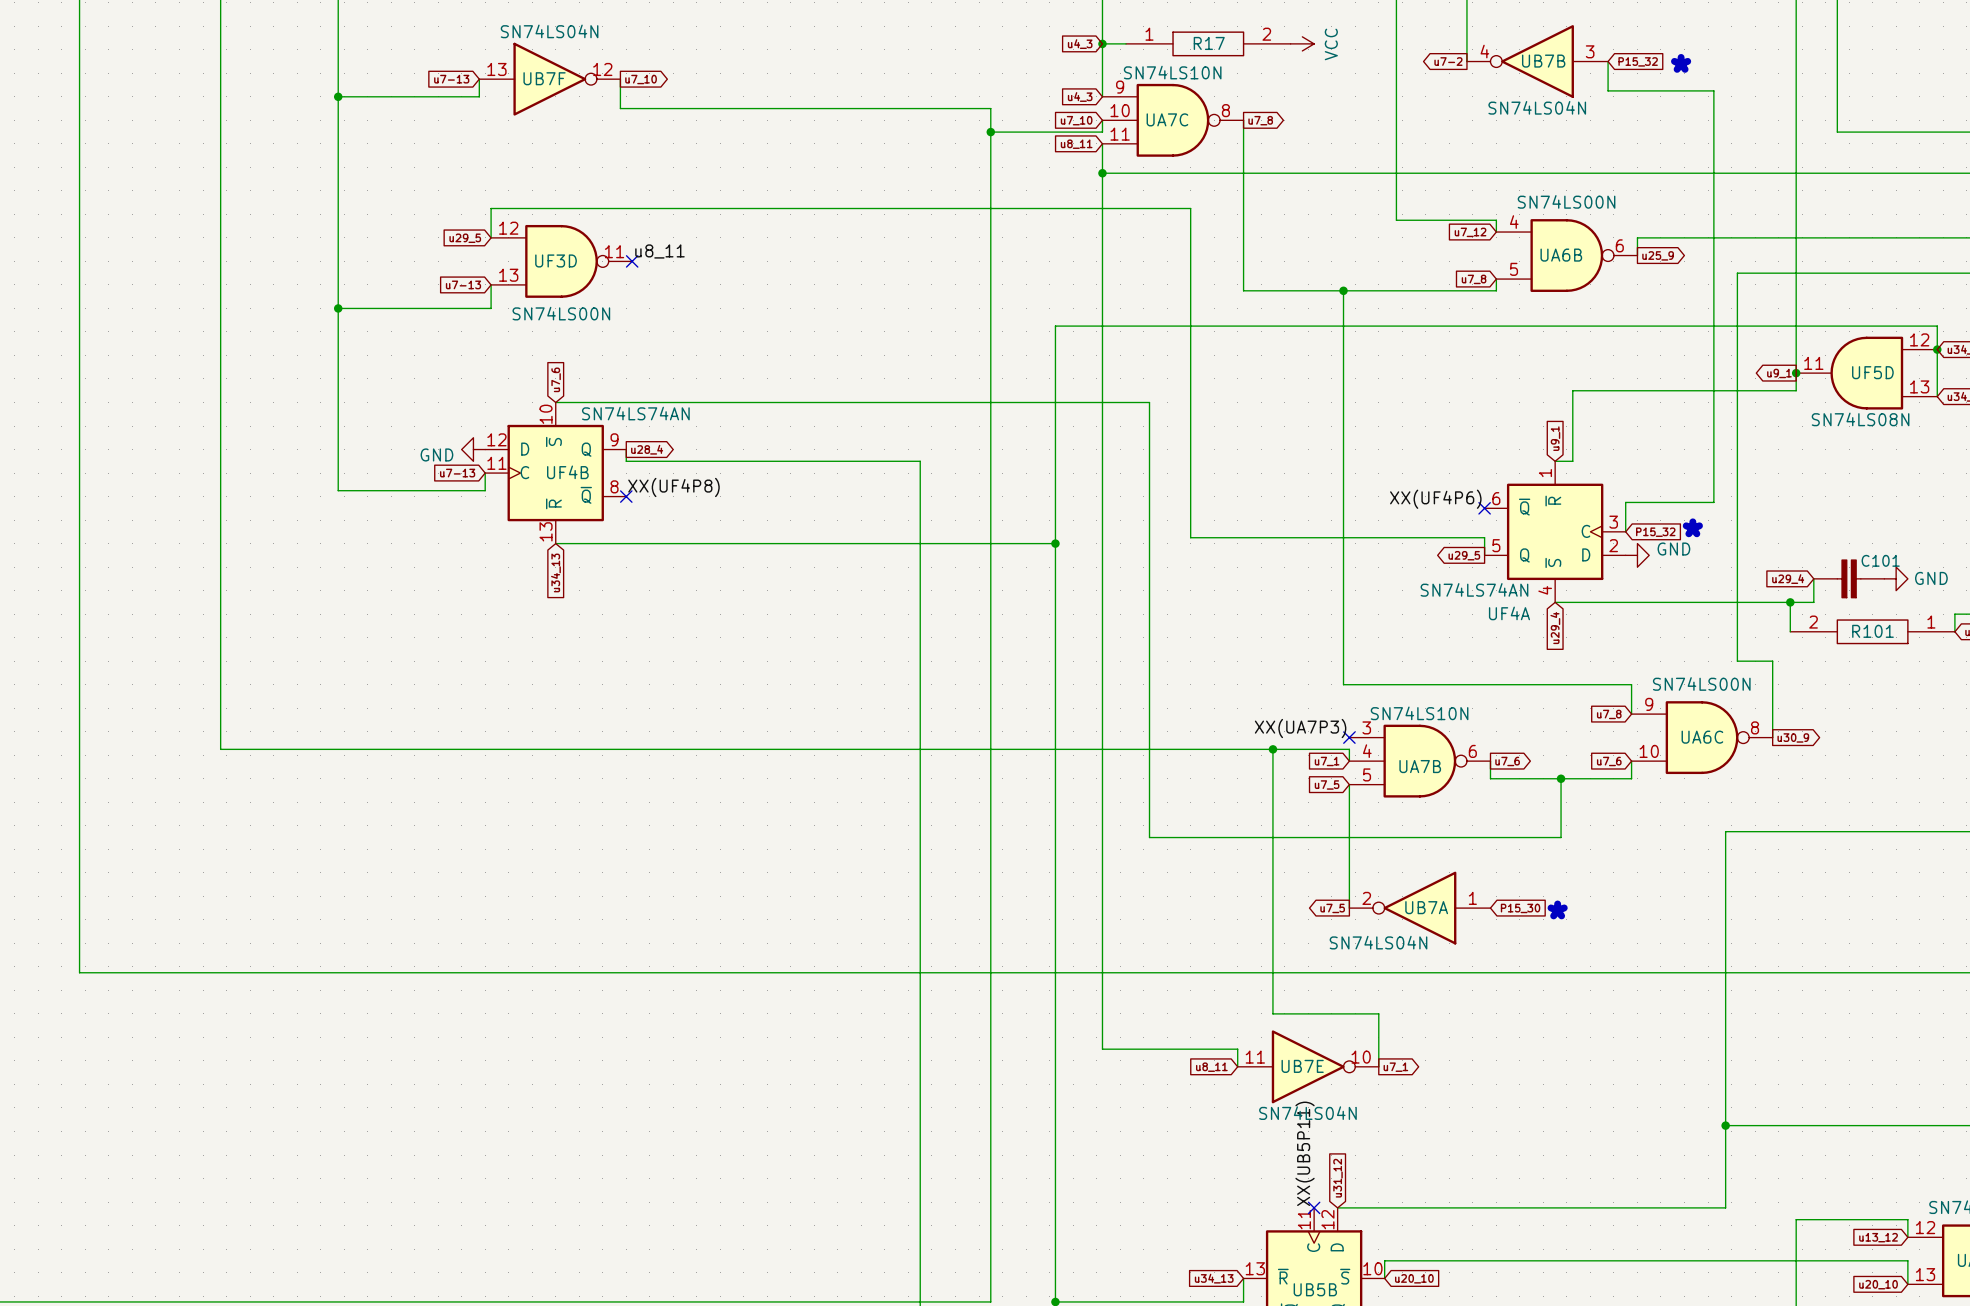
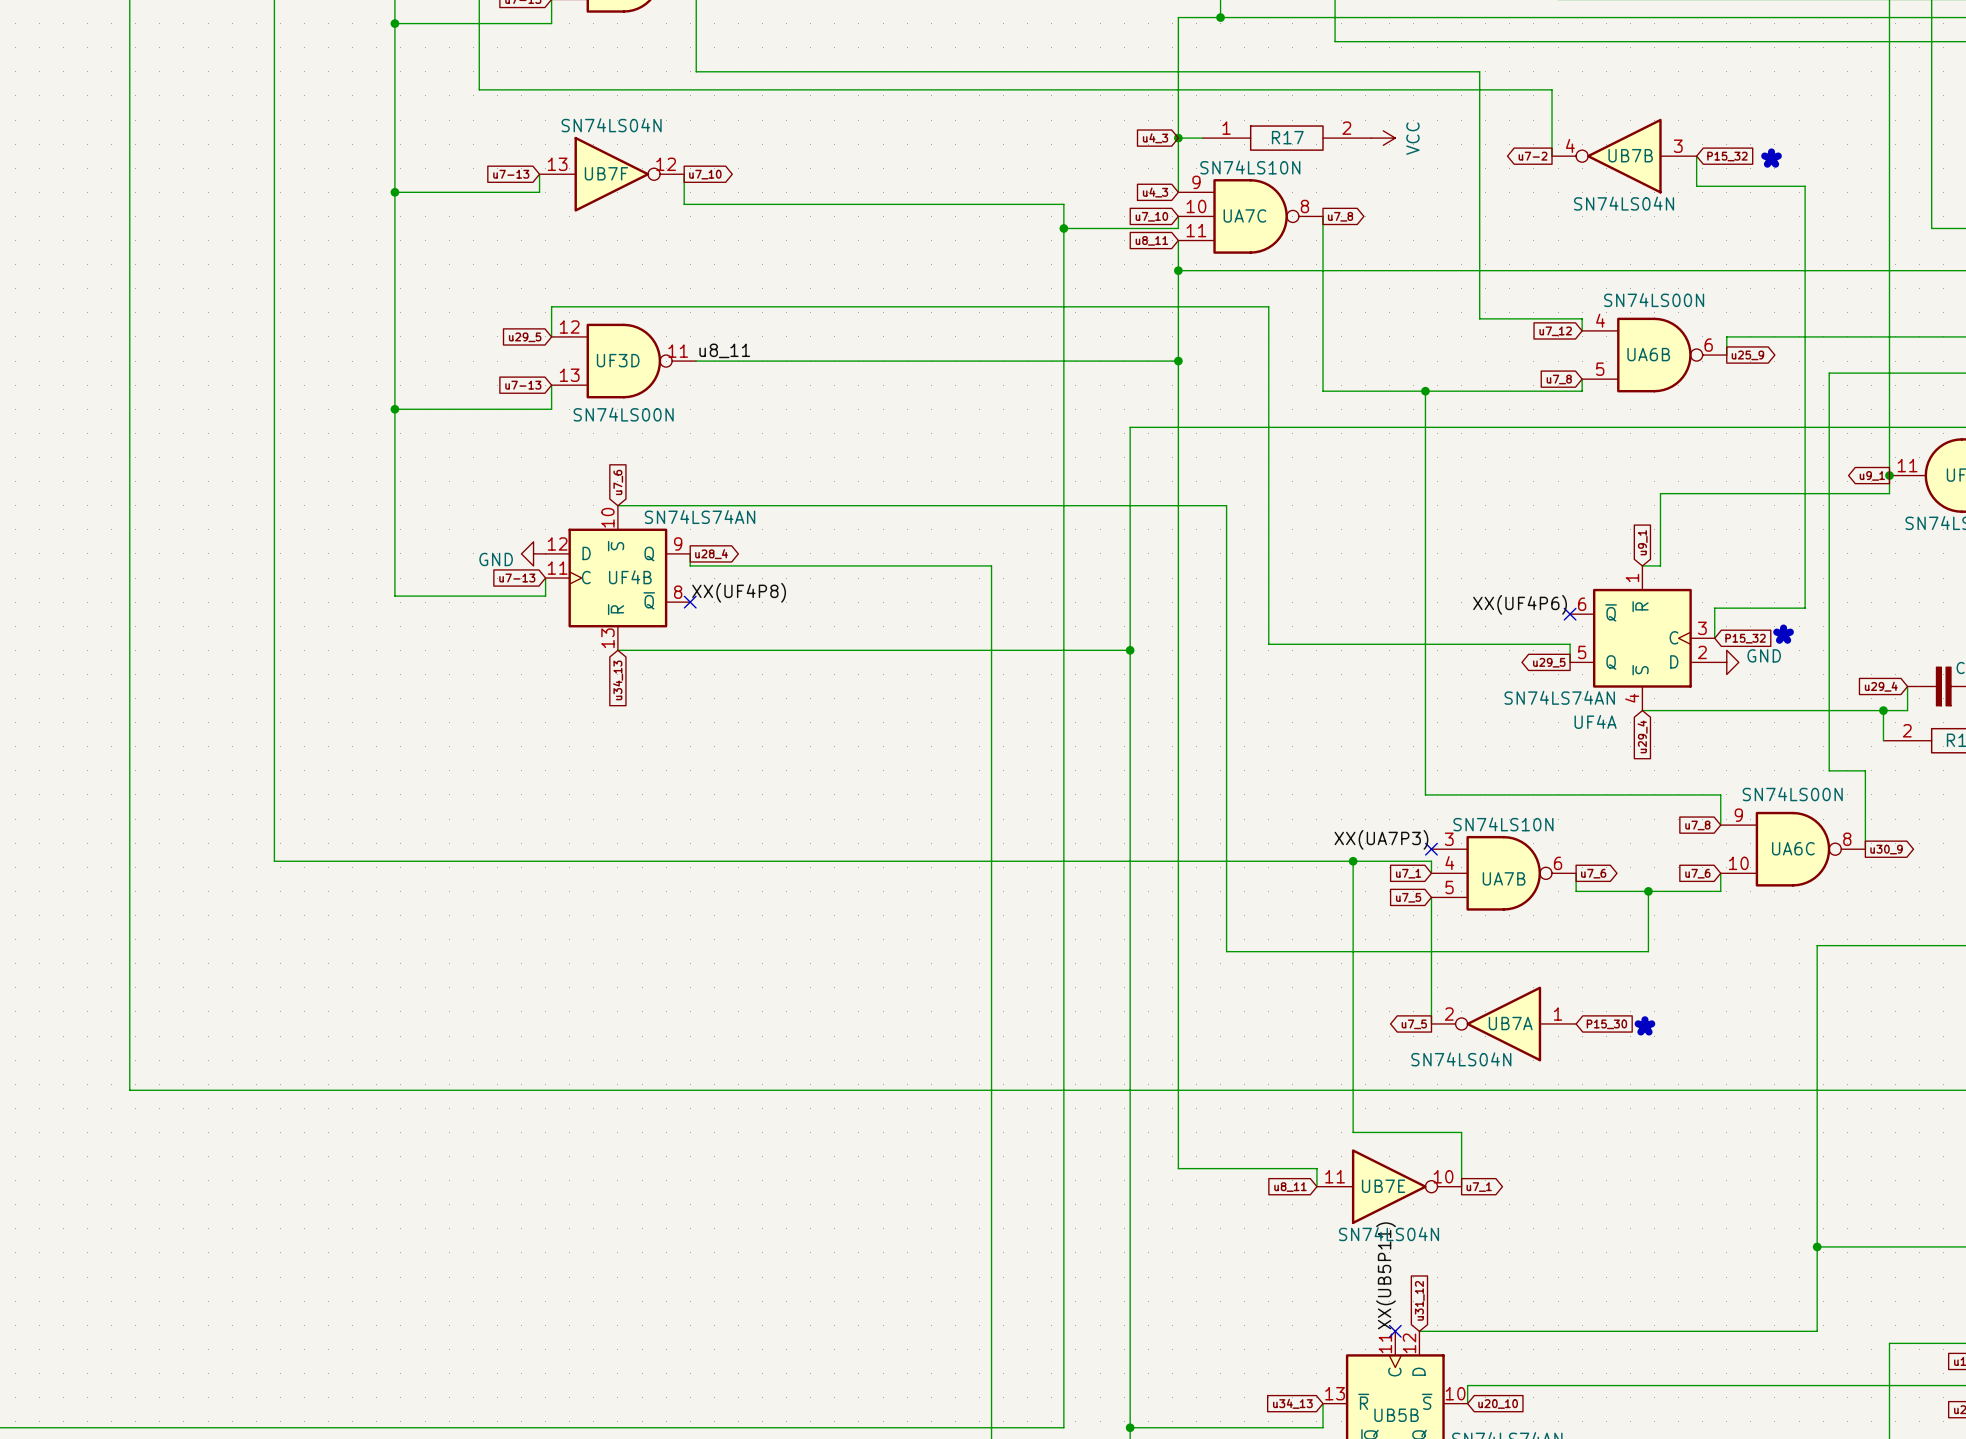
wire: none -> (696, 361) (1178, 361)
no-connect mark: (632, 261) -> none
junction: none -> (1178, 361)

